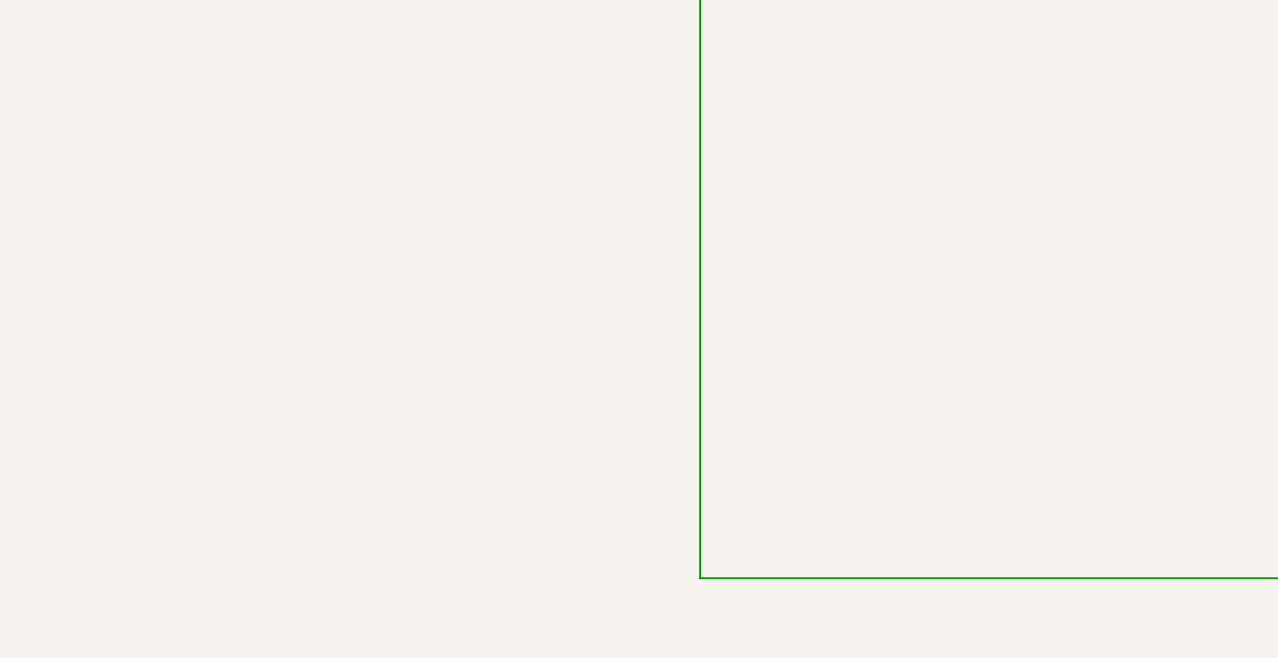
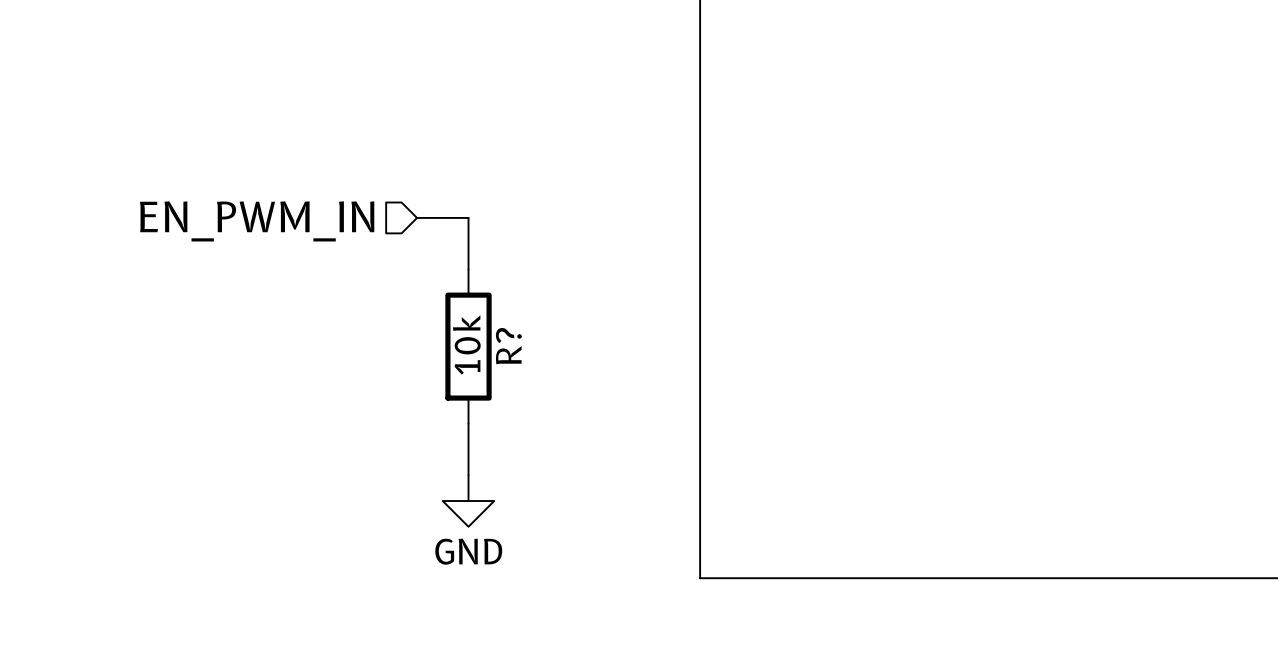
wire: none -> (417, 217) (468, 217) (468, 269)
hierarchical label: none -> EN_PWM_IN (257, 221)
R?: none -> 10k (468, 346)
wire: none -> (468, 423) (468, 475)
power symbol: none -> GND (468, 501)

